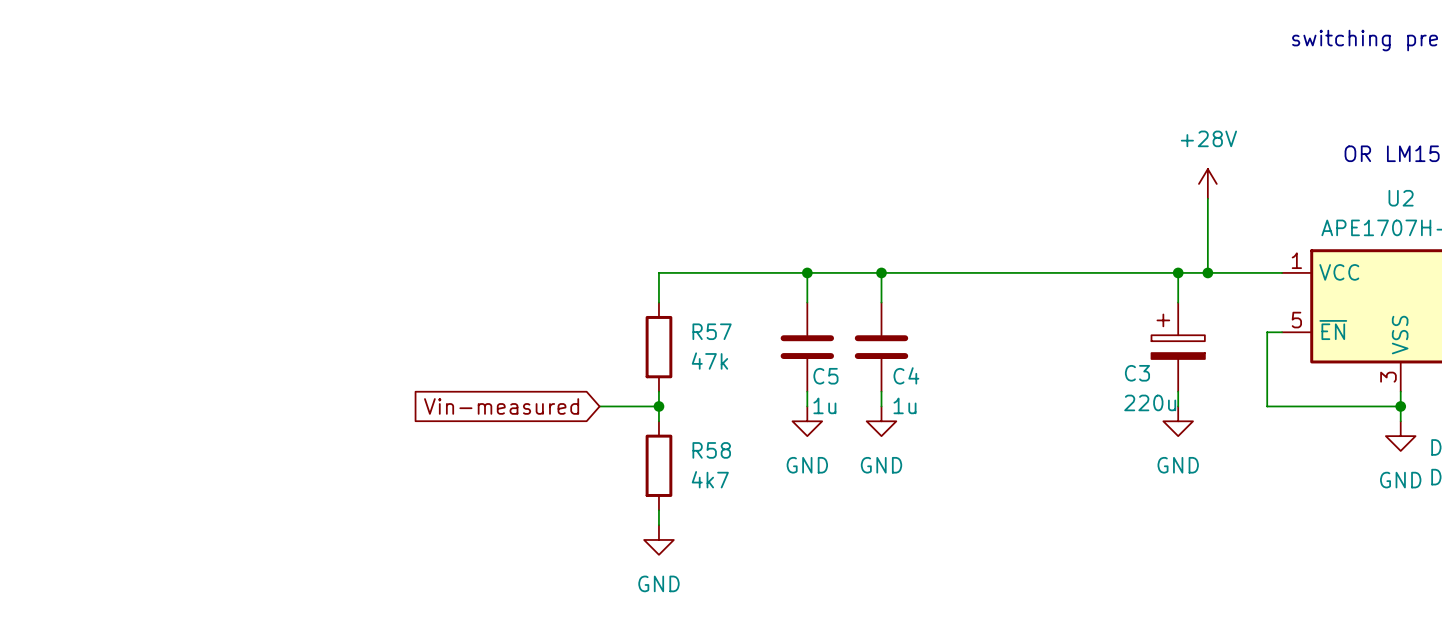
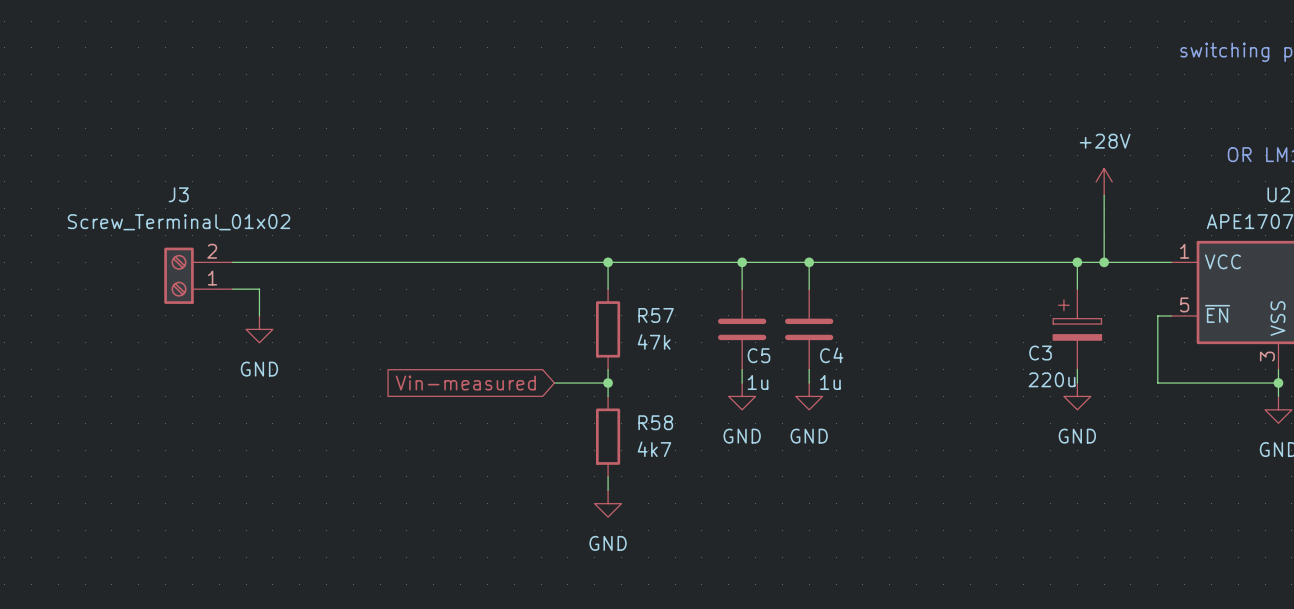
wire: none -> (232, 262) (608, 262)
junction: none -> (608, 262)
J3: none -> Screw_Terminal_01x02 (198, 275)
wire: none -> (232, 289) (259, 289) (259, 315)
power symbol: none -> GND (259, 329)

